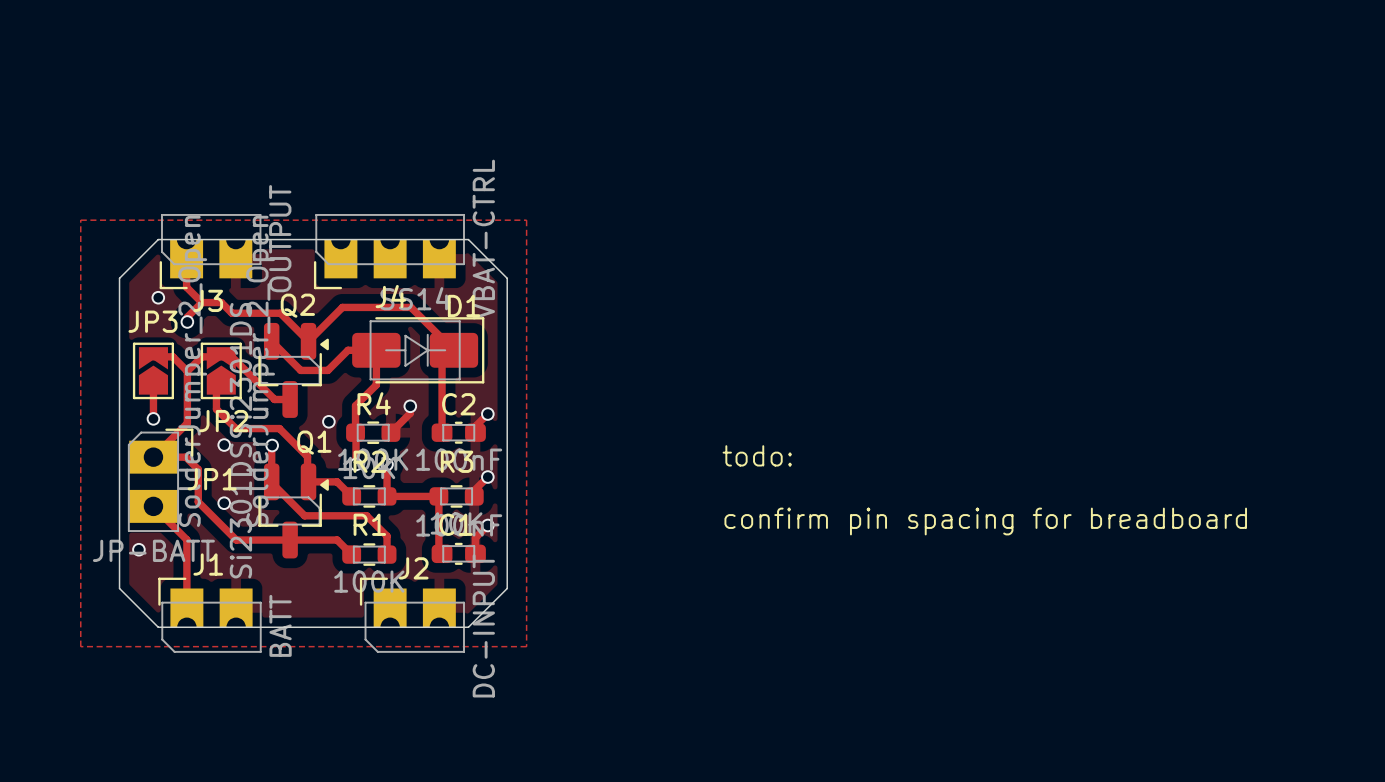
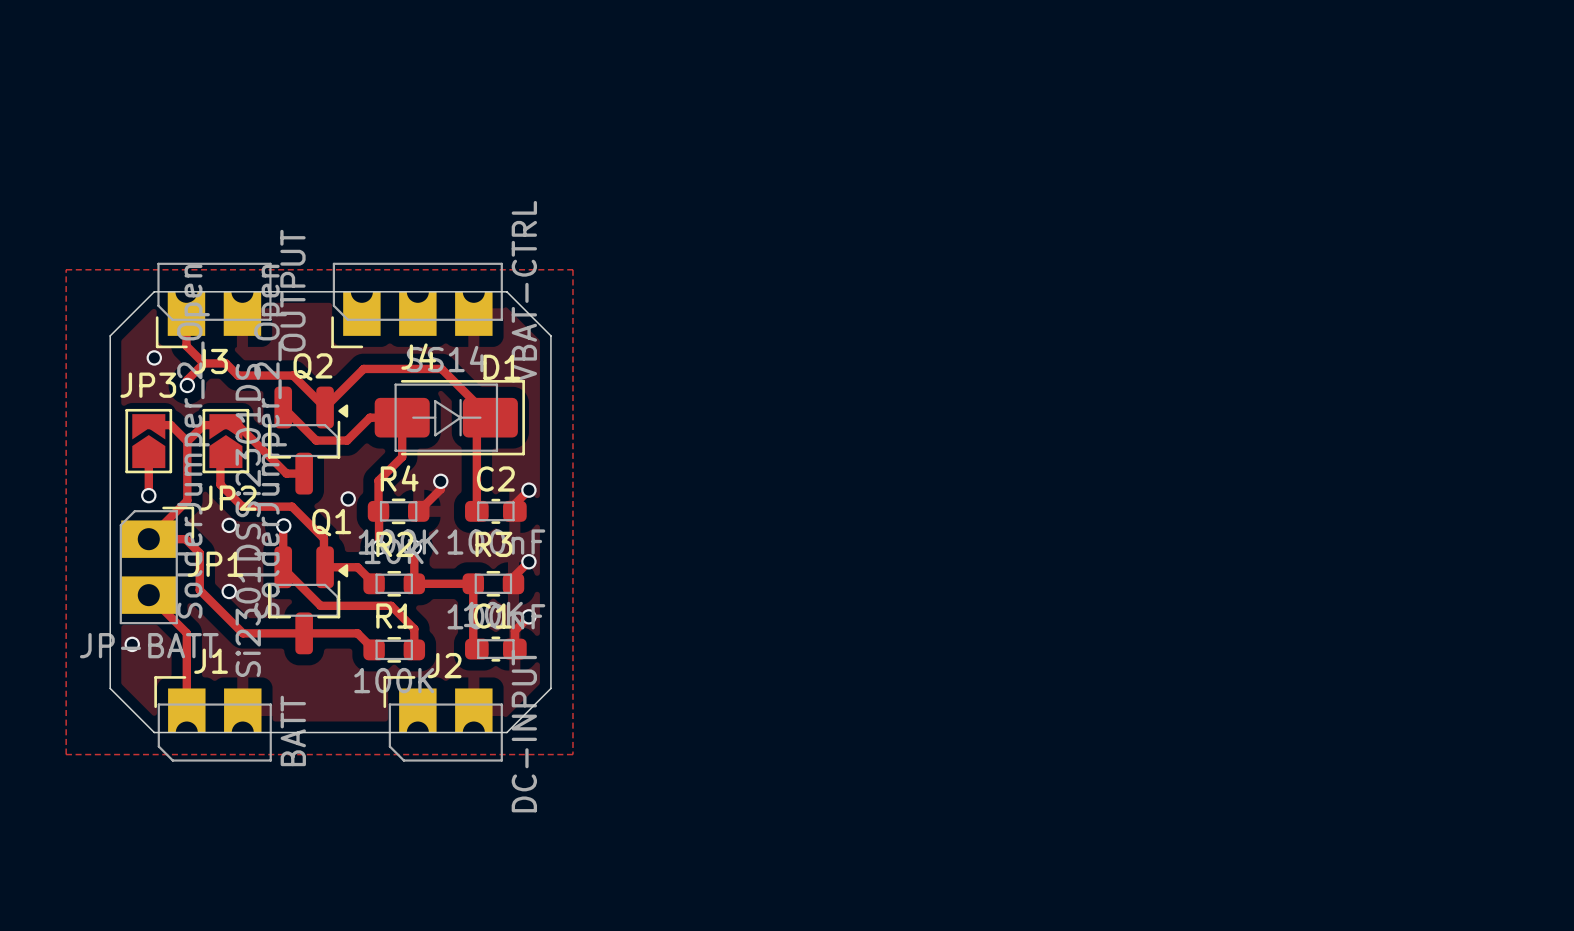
text: todo: (757, 455) -> none
text: confirm pin spacing for breadboard (985, 521) -> none

